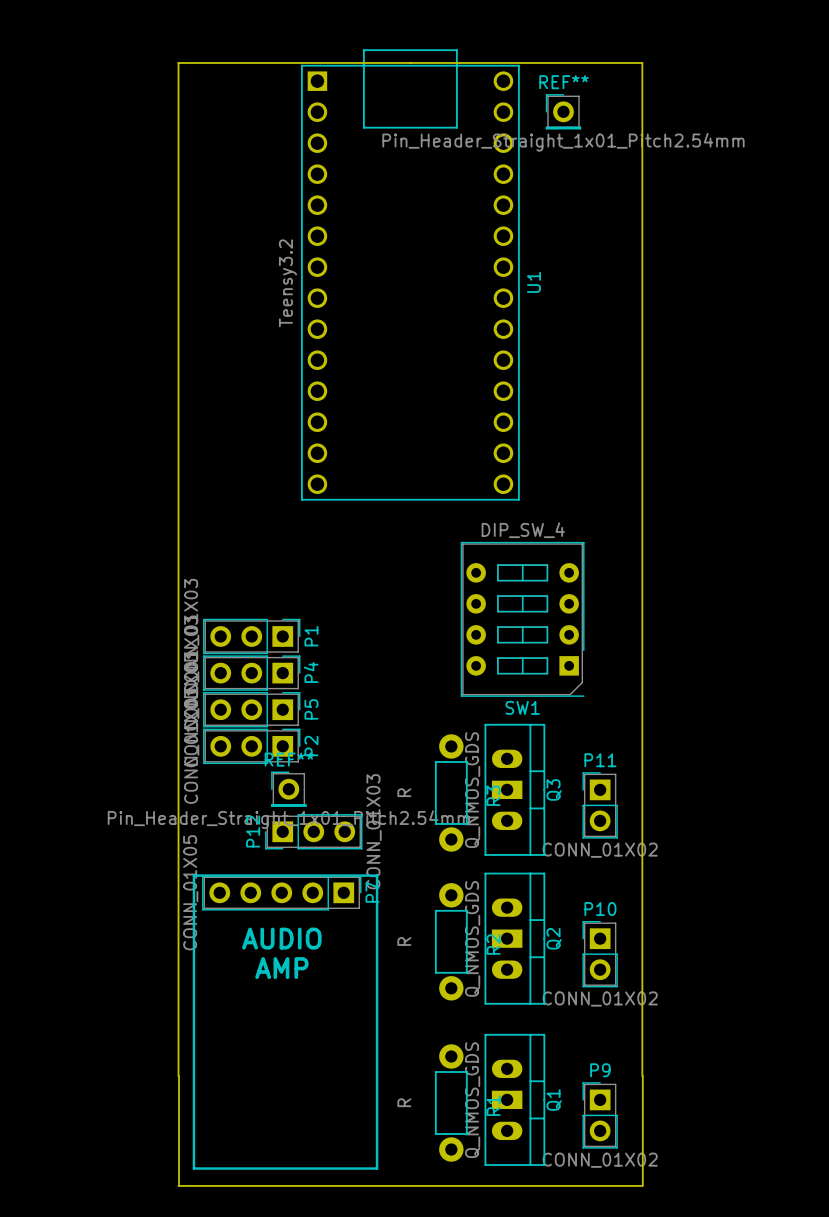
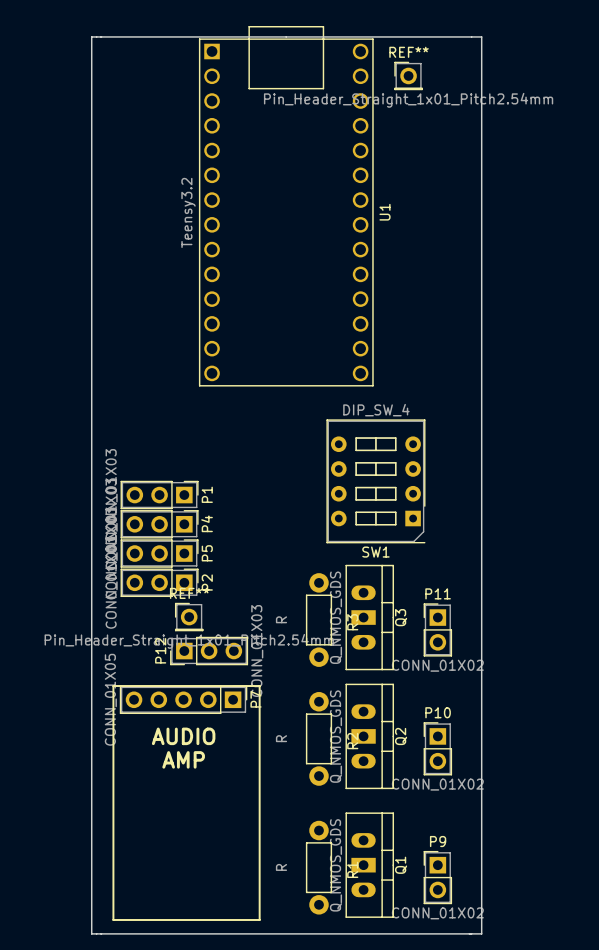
board edge: (178, 62) (178, 1076) -> (101, 36) (91, 36) (91, 933) (101, 933)
board edge: (642, 62) (642, 1076) -> (471, 36) (481, 36) (481, 933) (471, 933)
board edge: (179, 1076) (179, 1185) -> none
board edge: (642, 1076) (642, 1185) -> none

